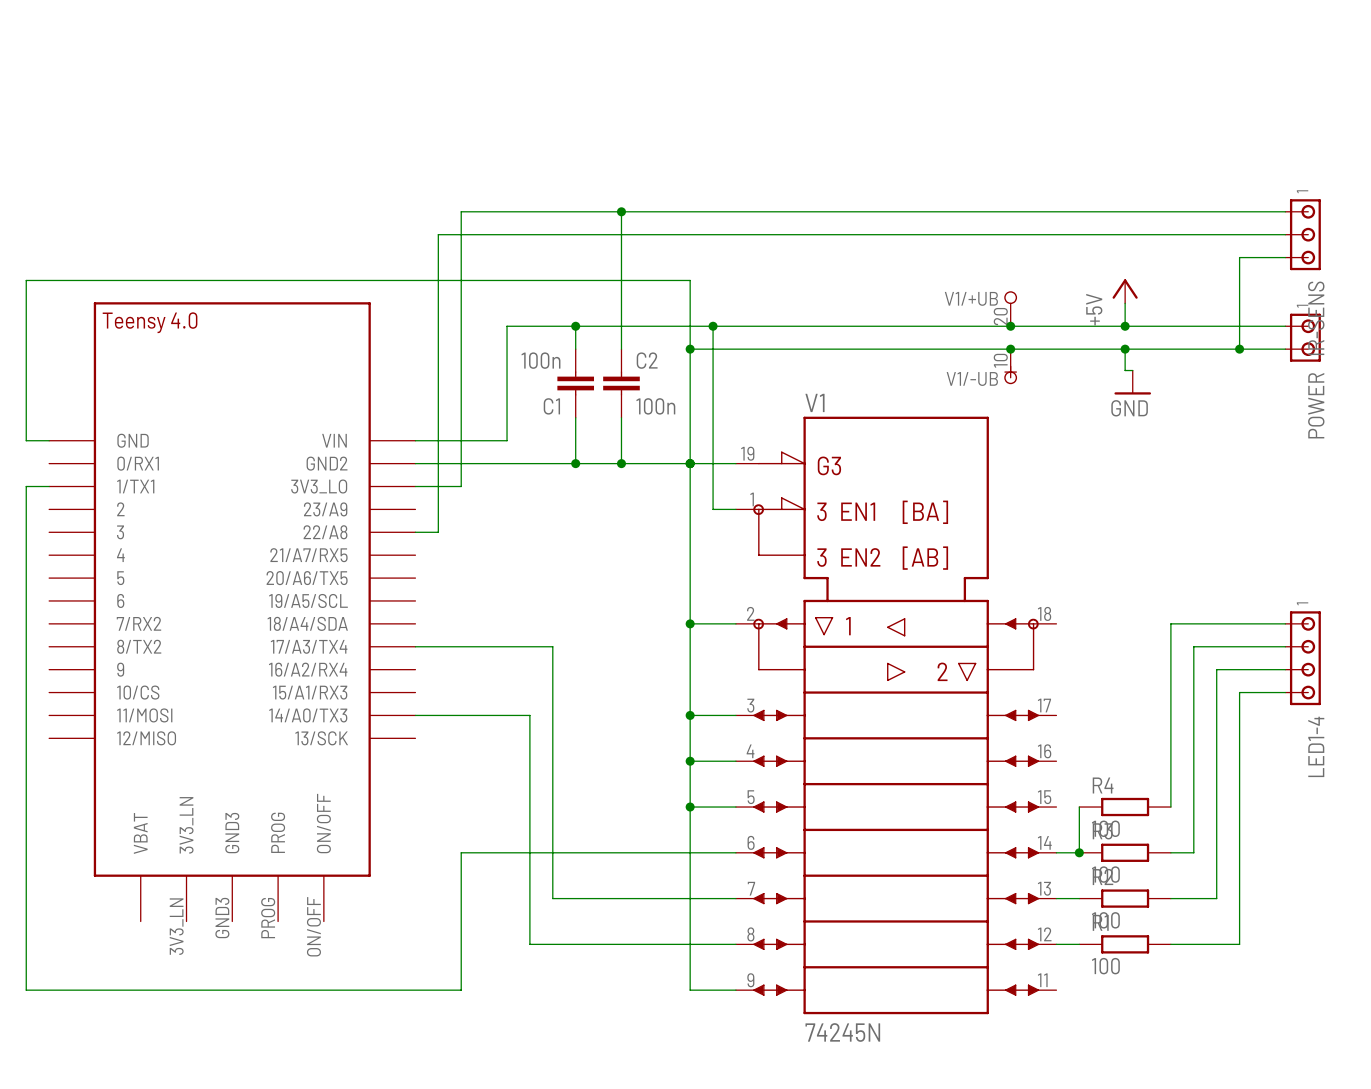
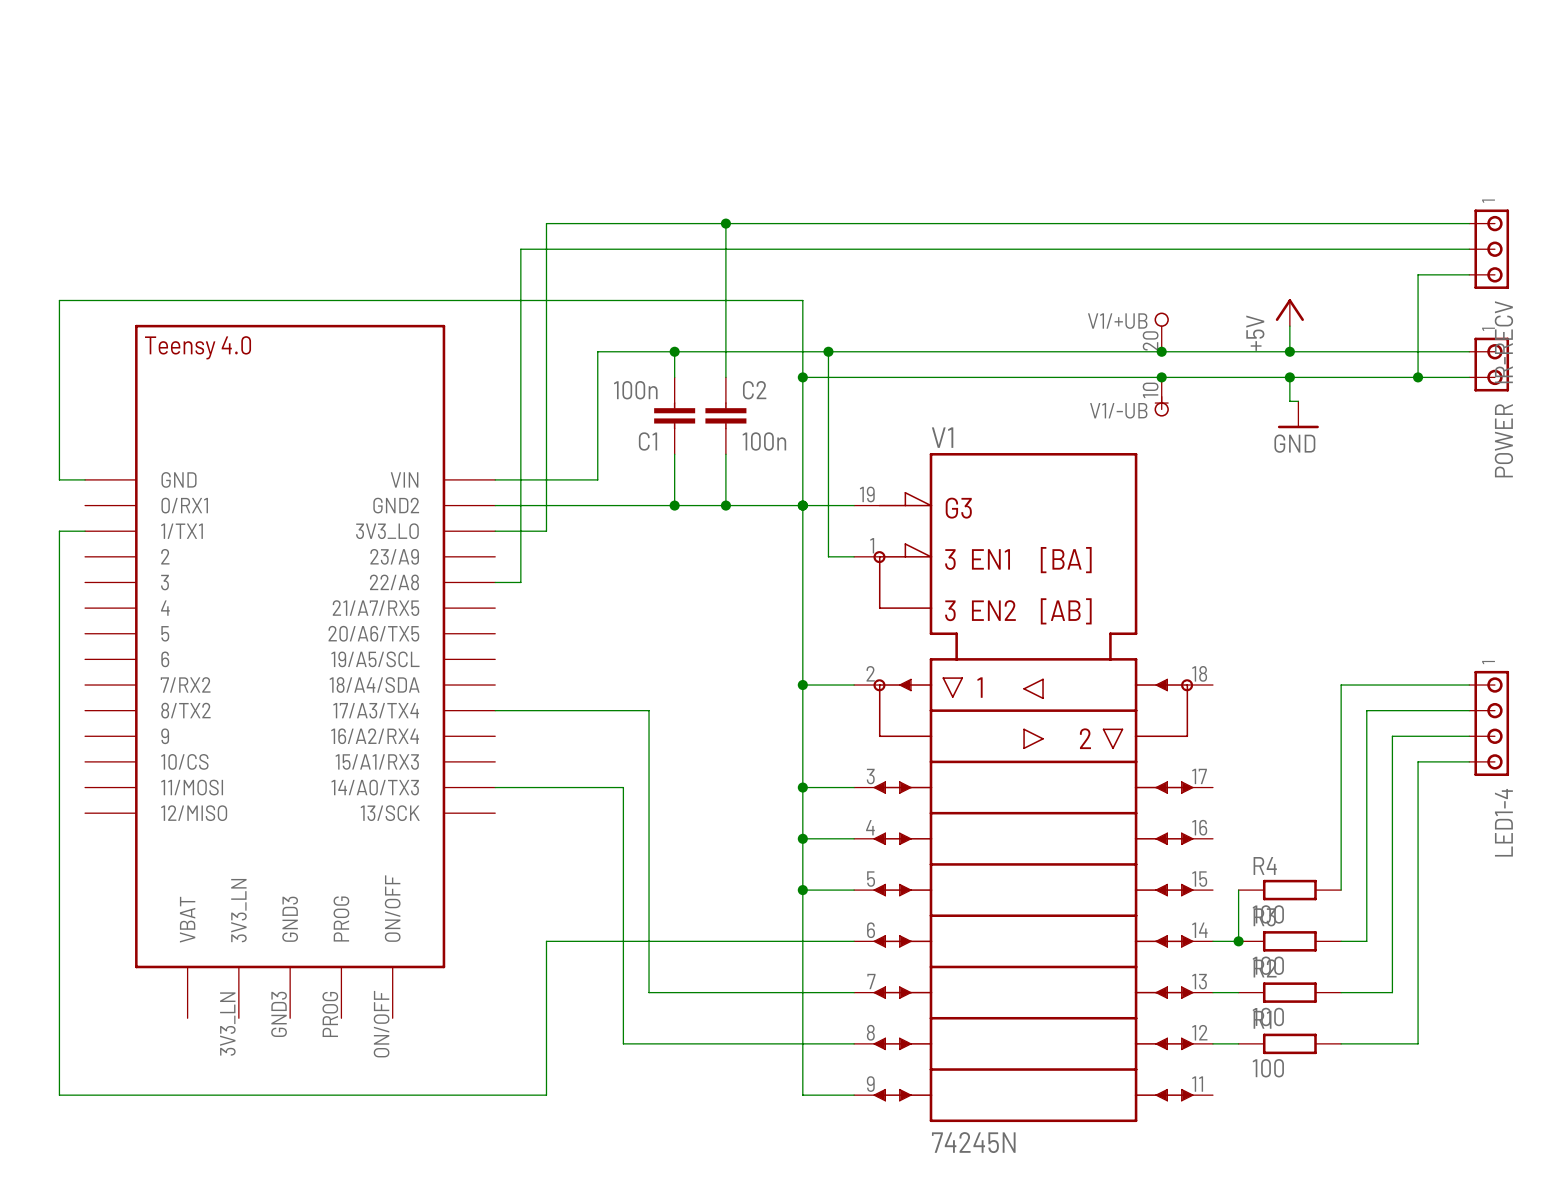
IR-SENS name: IR-SENS (1316, 318) -> IR-RECV (1503, 342)

